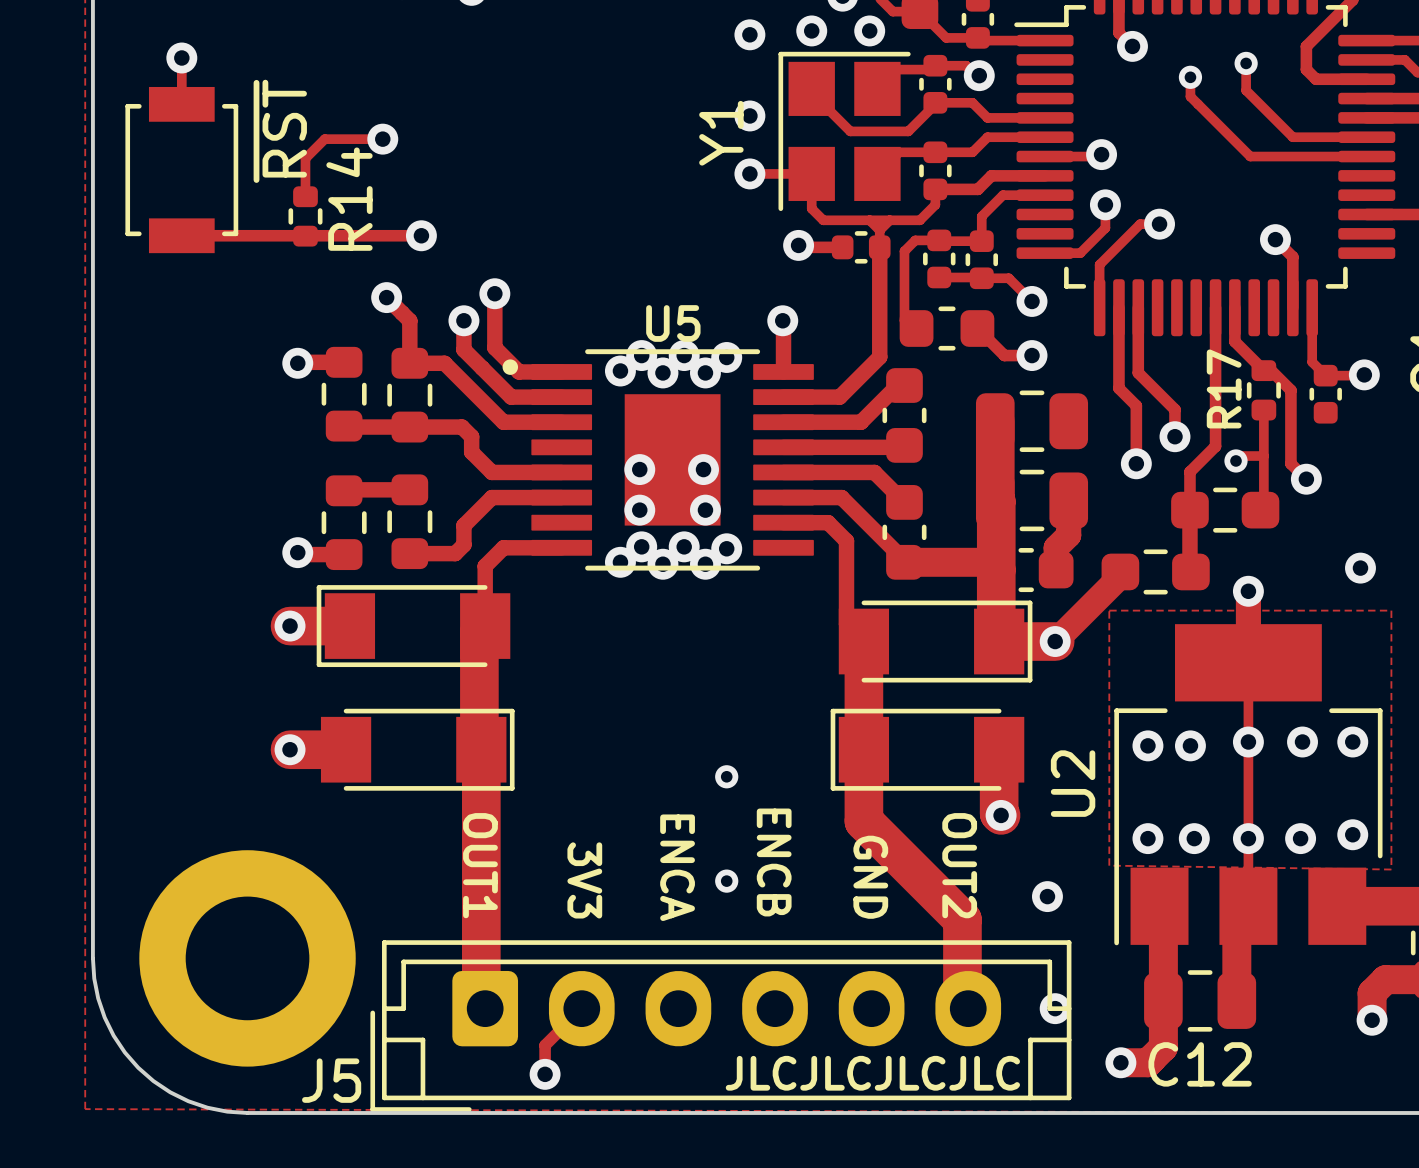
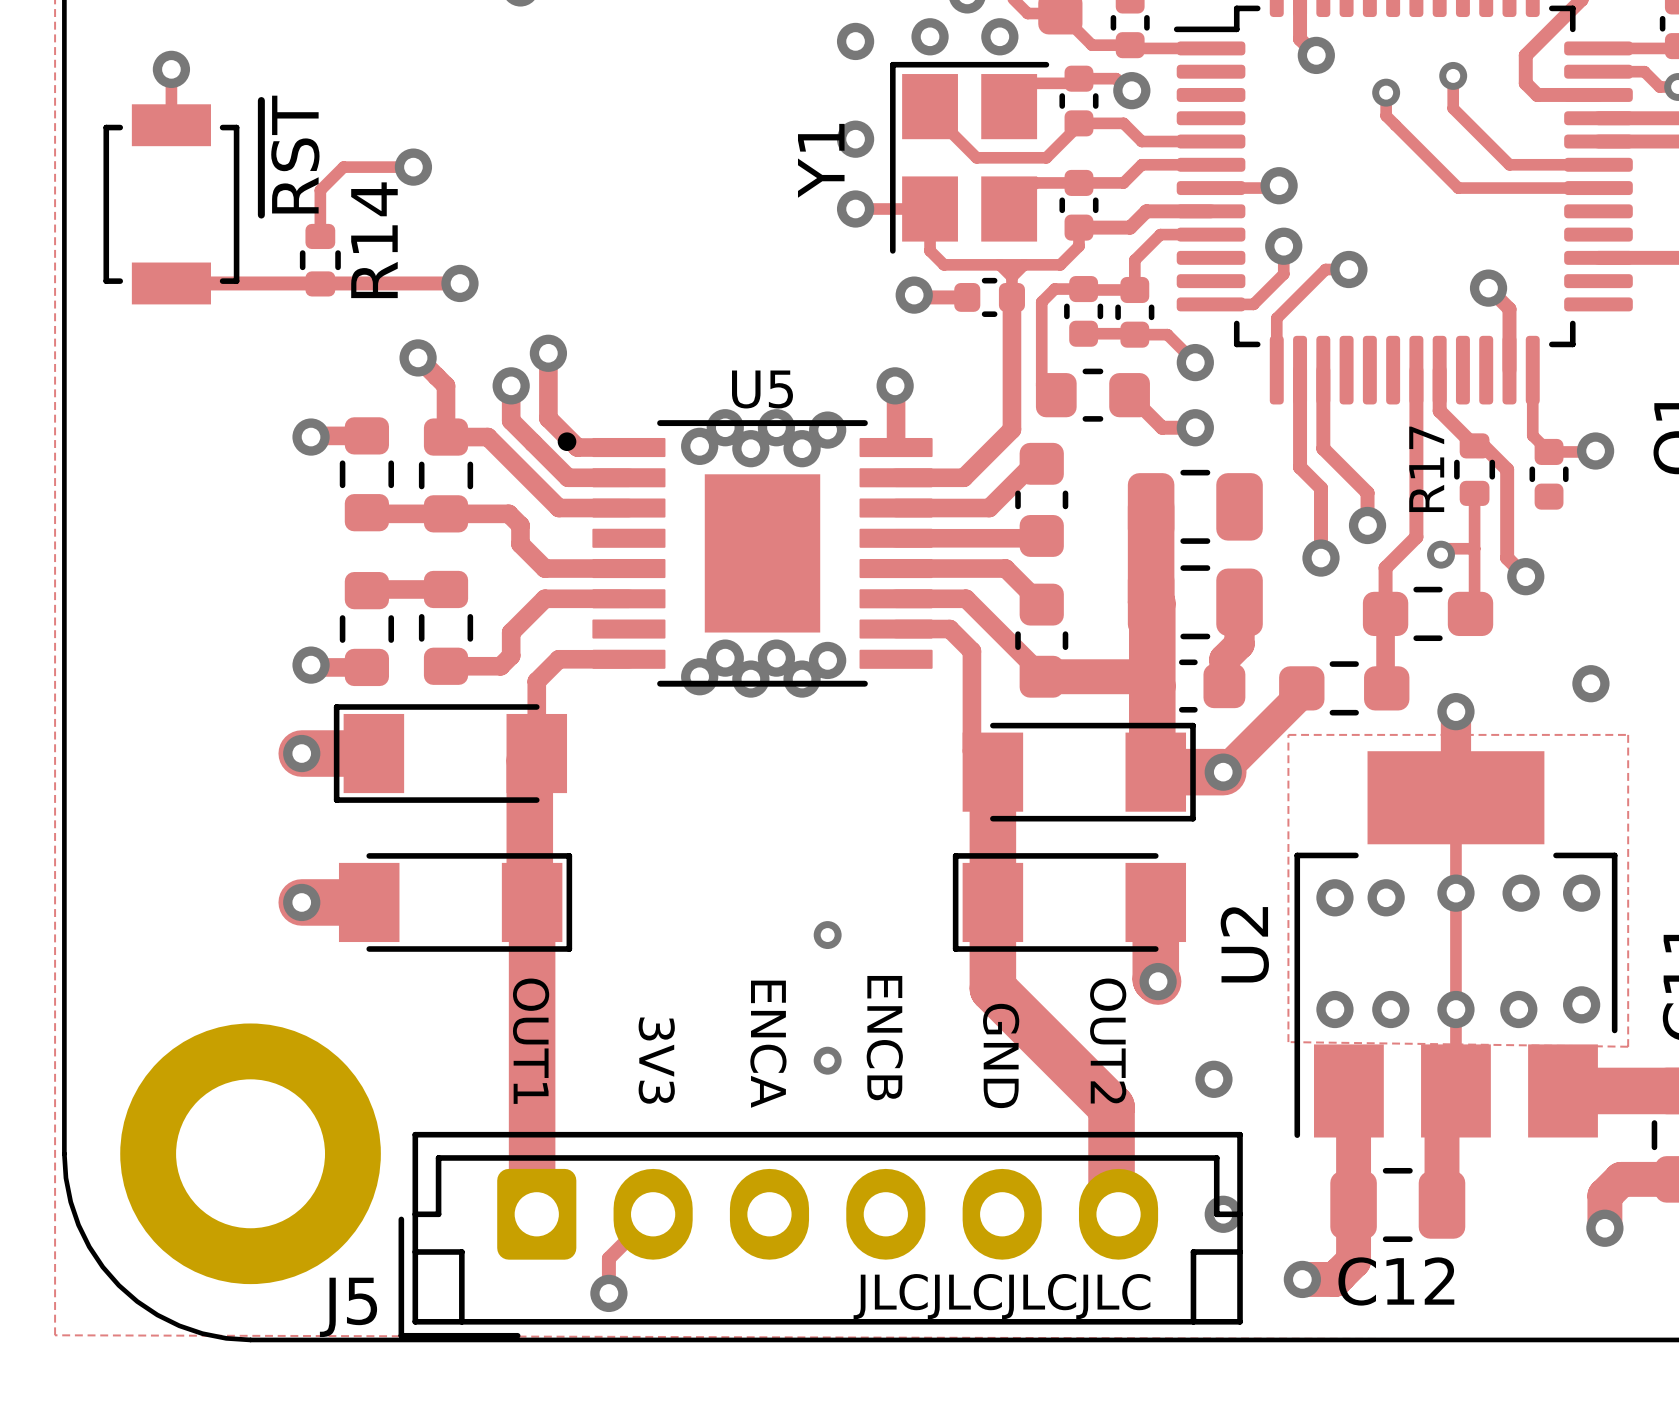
via: (639, 469) -> none
via: (703, 469) -> none
via: (639, 510) -> none
via: (705, 510) -> none

